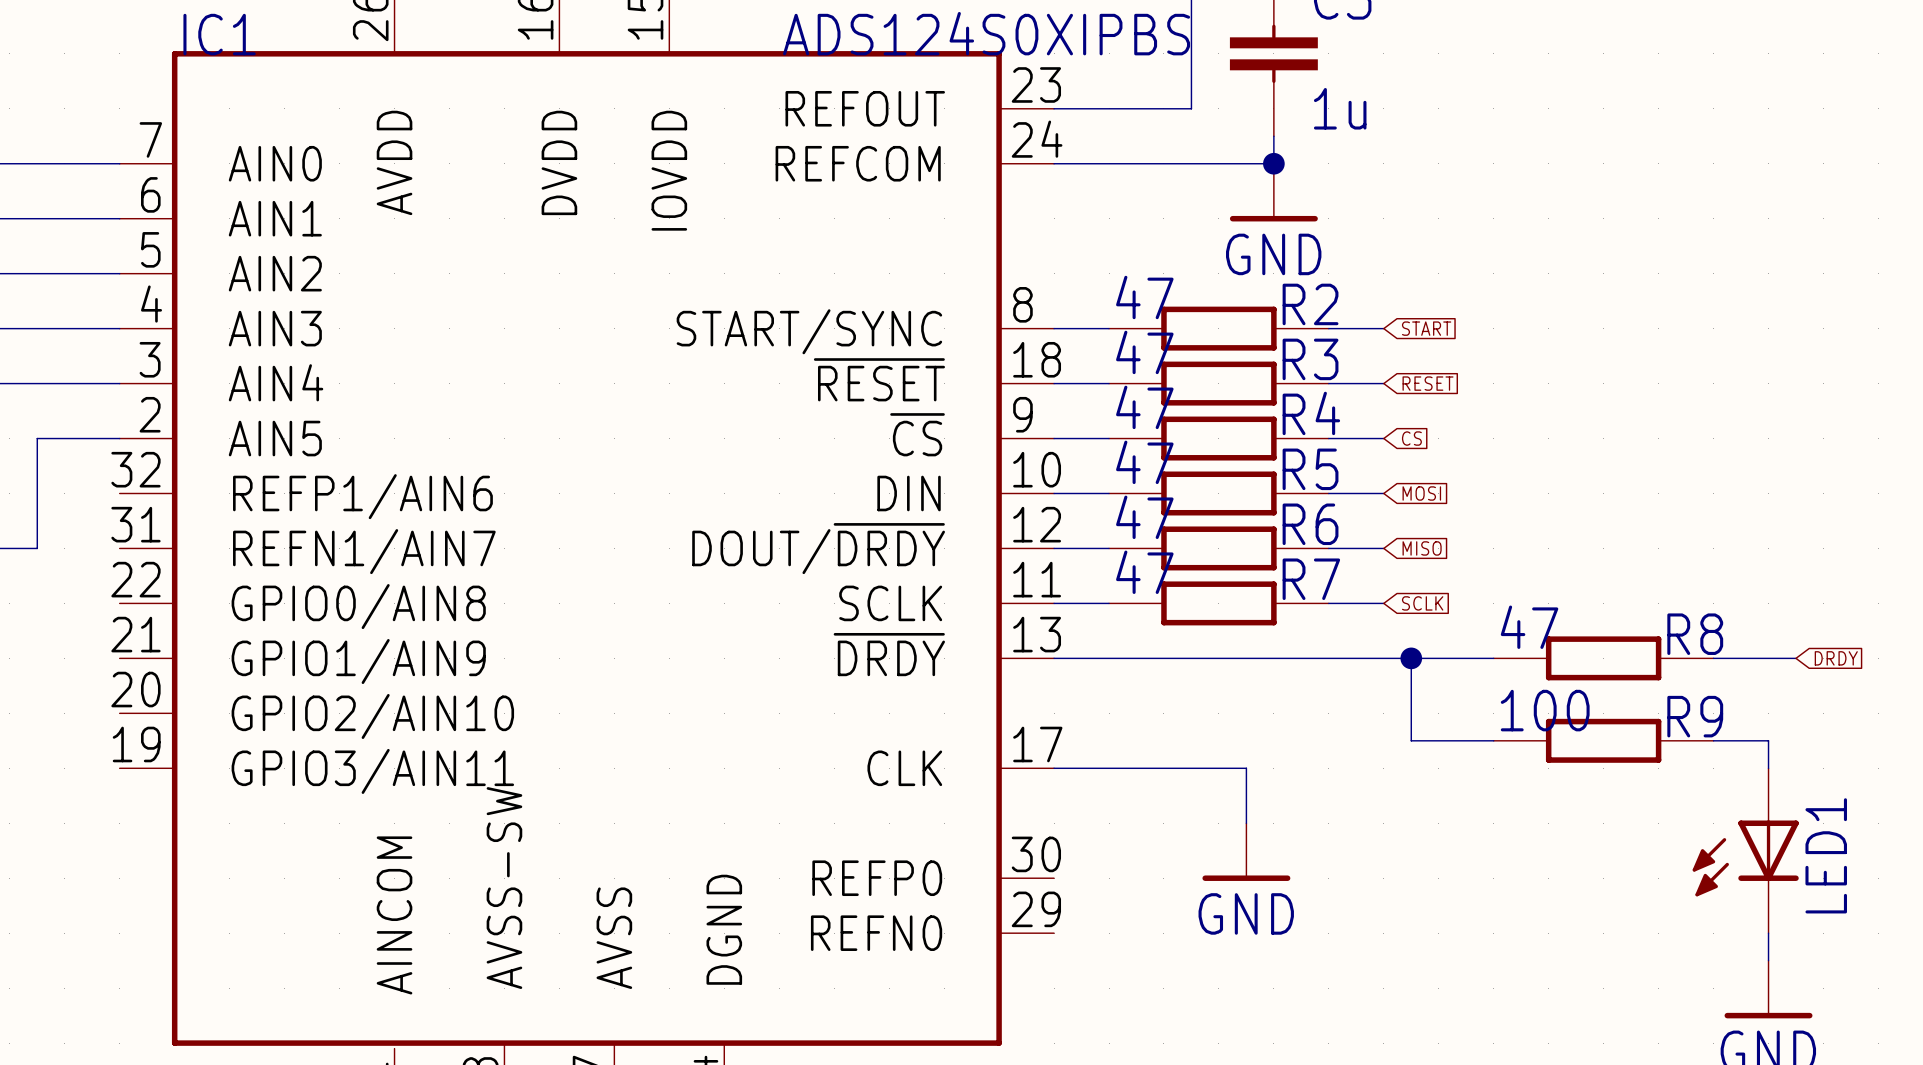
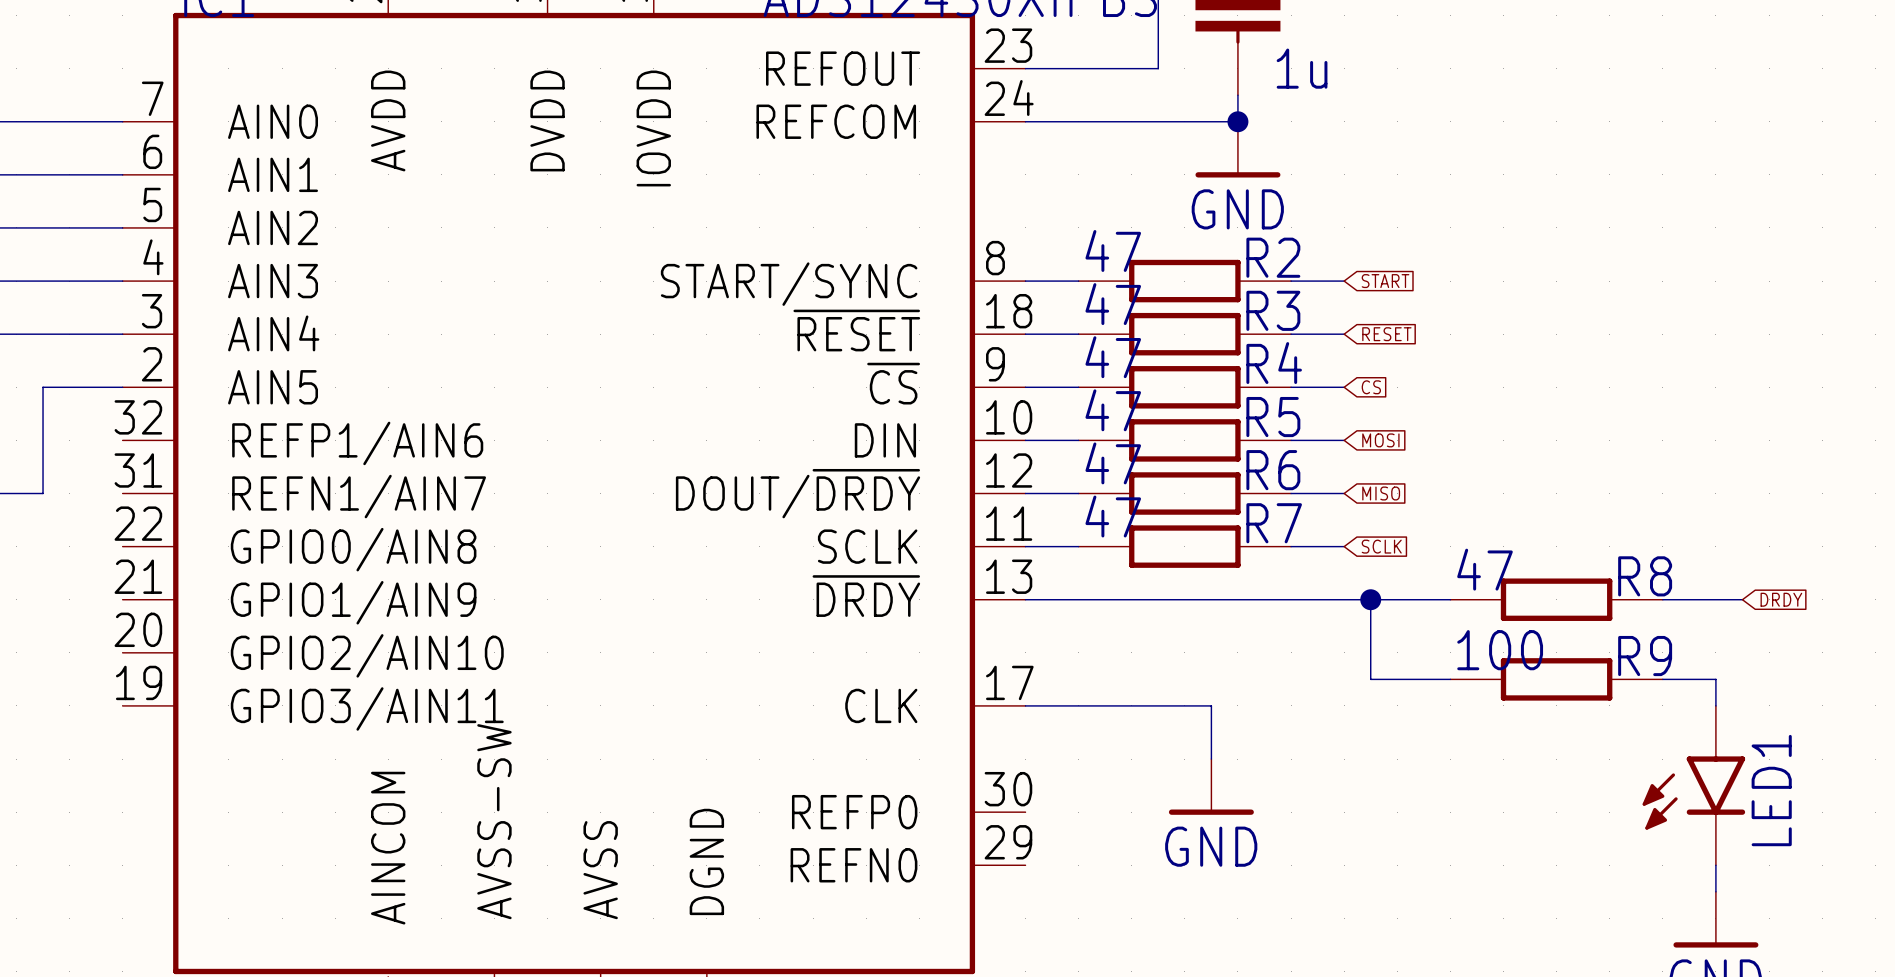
LED1 symbol: [1692, 768, 1799, 934] -> [1642, 705, 1746, 866]

